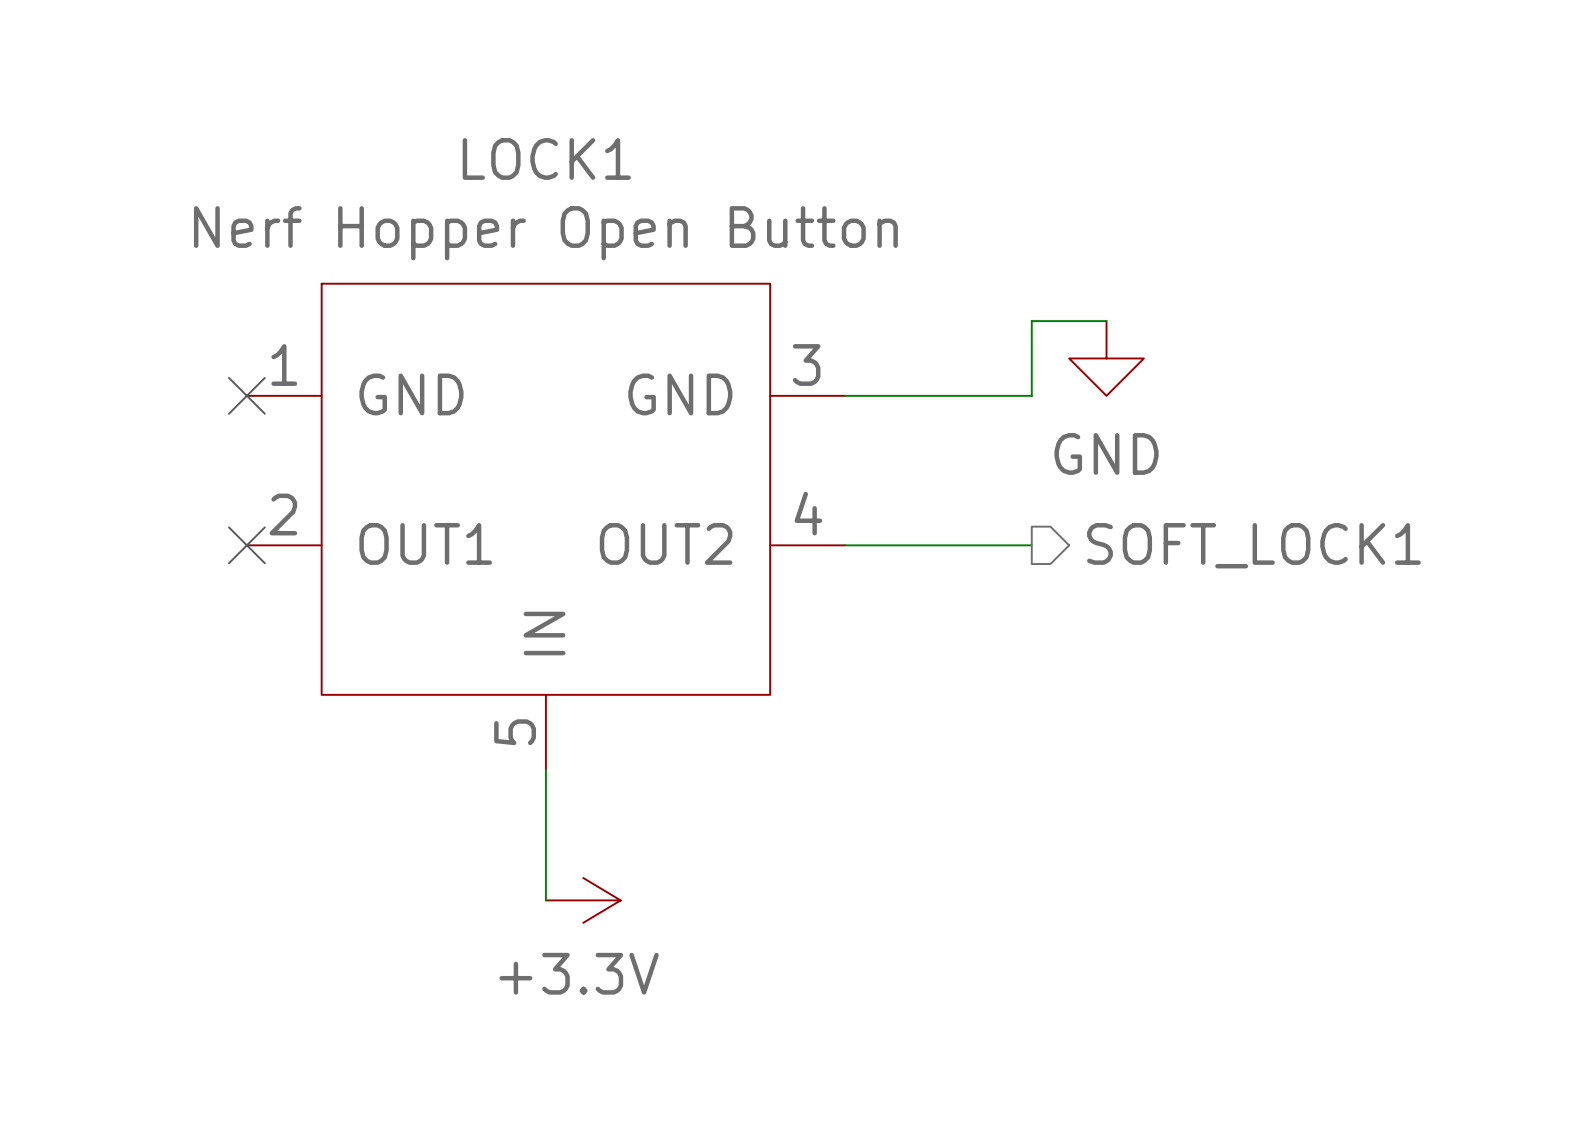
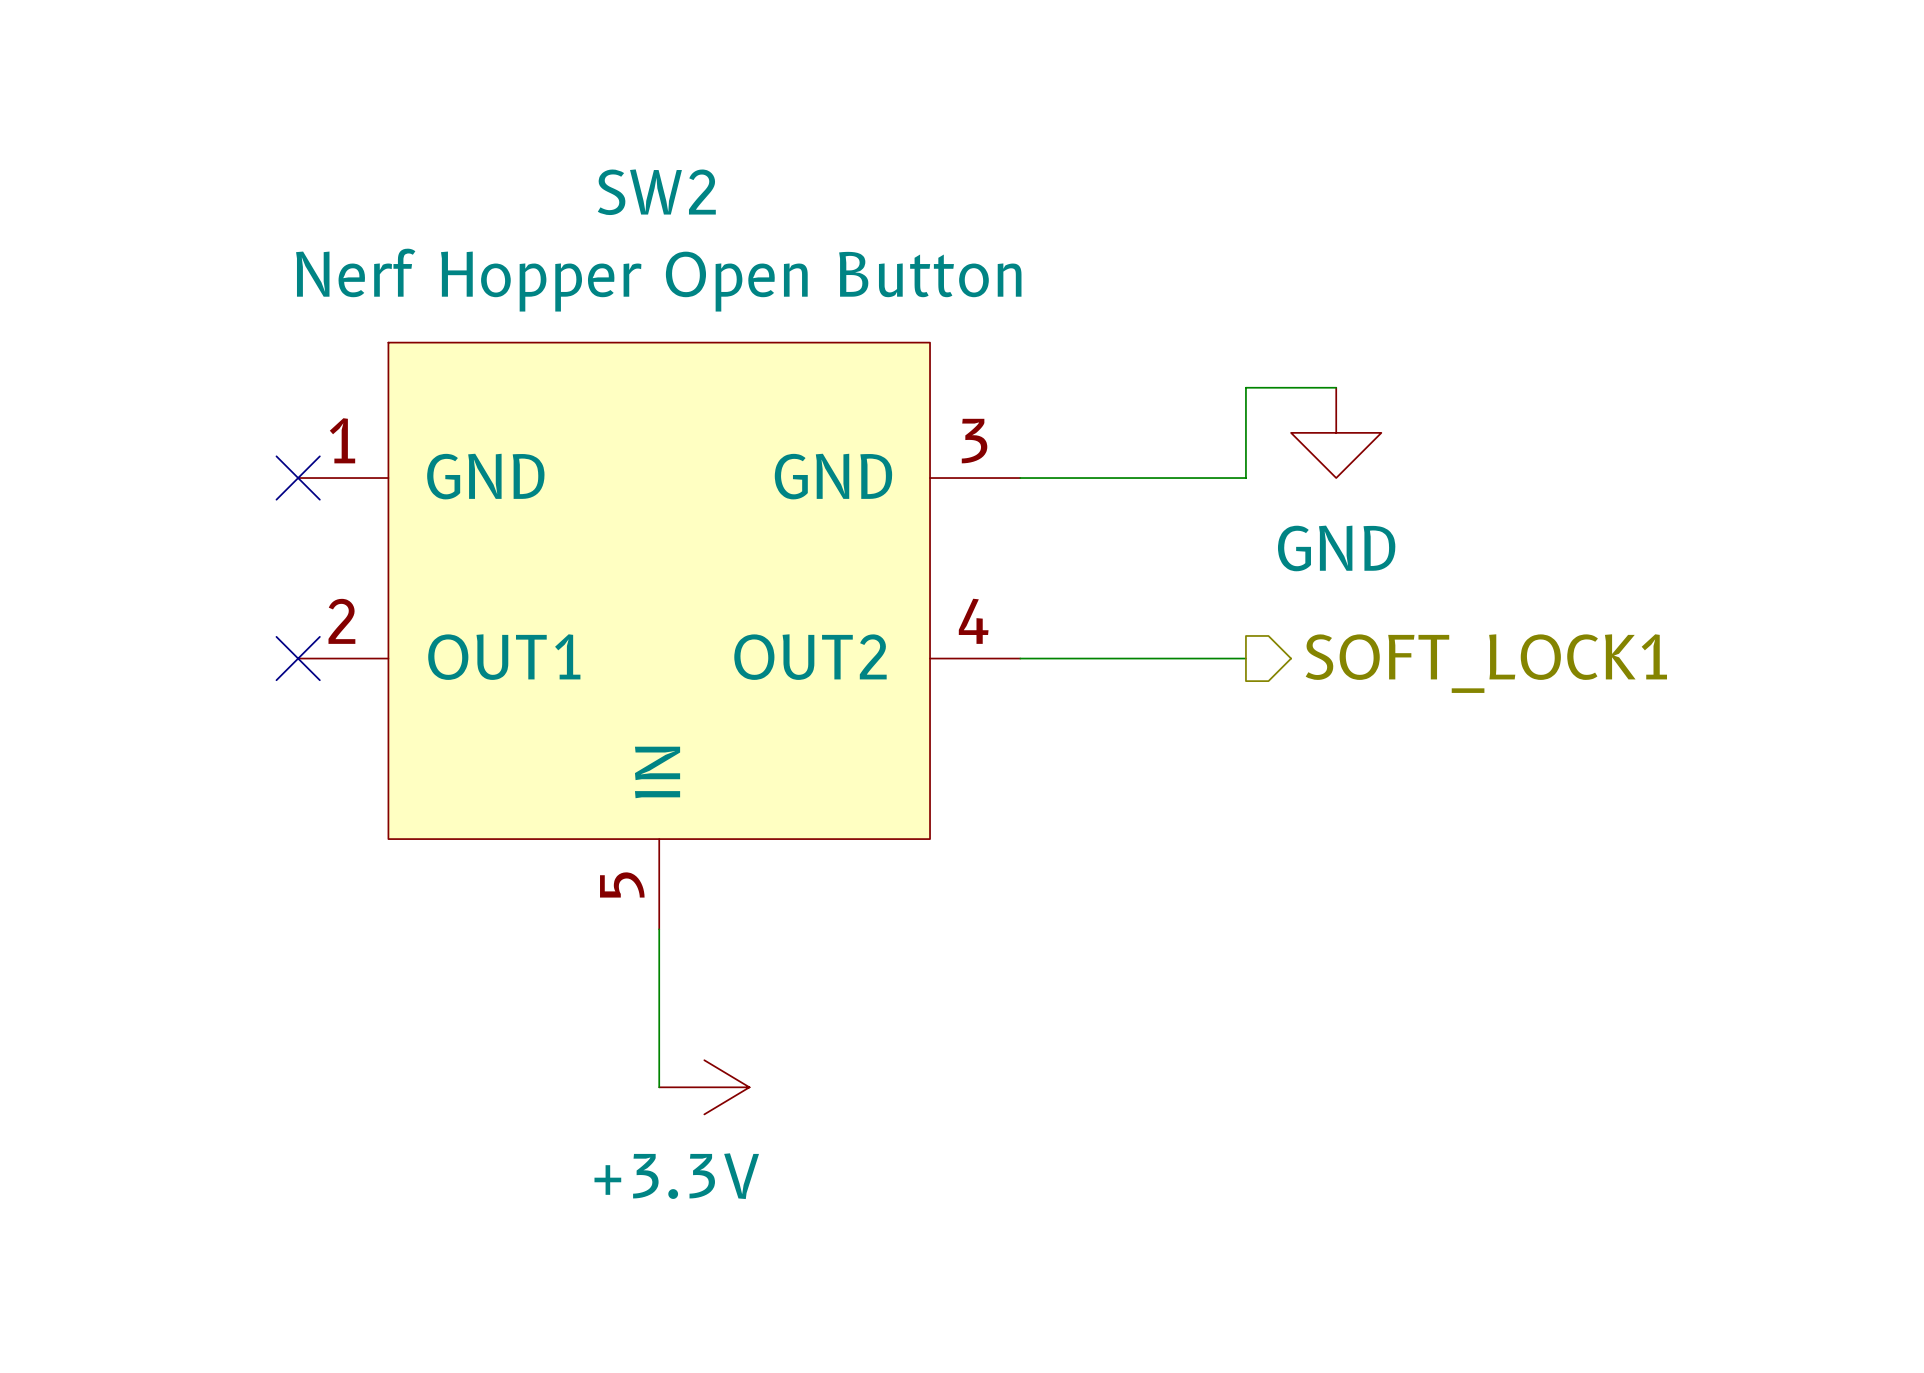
LOCK1 name: LOCK1 (546, 158) -> SW2 (656, 192)

